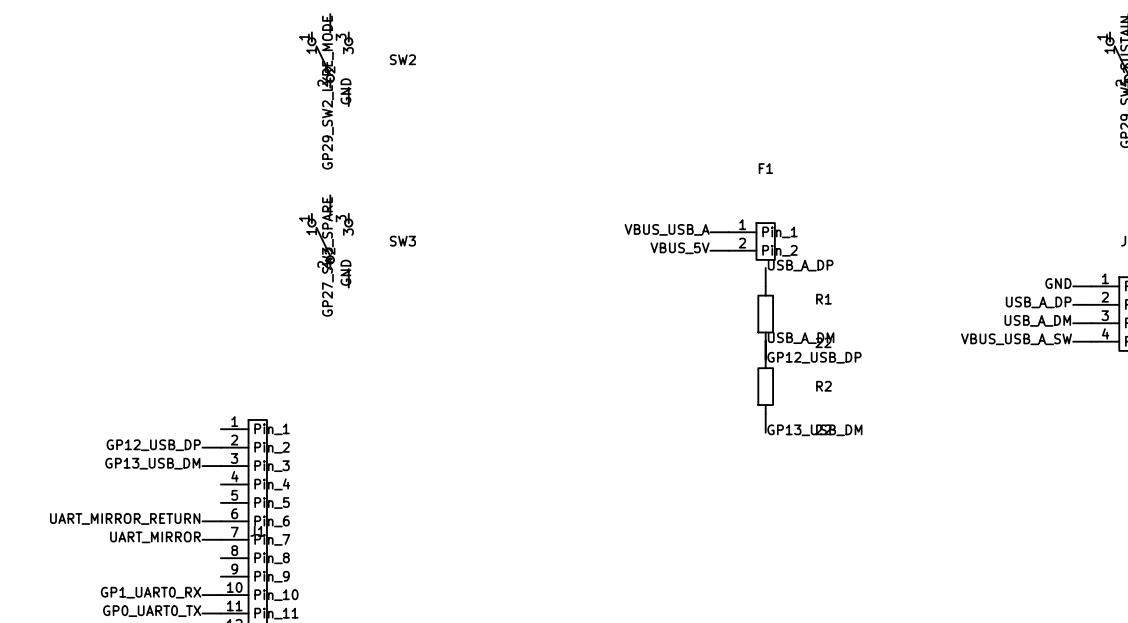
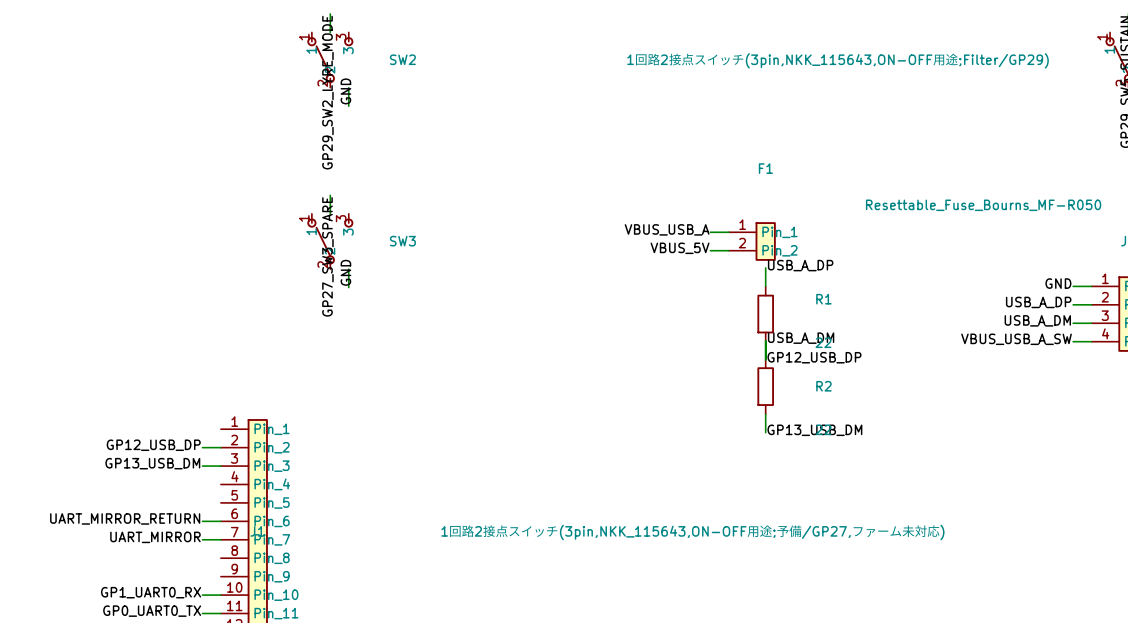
SW2 value: none -> 1回路2接点スイッチ(3pin,NKK_115643,ON-OFF用途;Filter/GP29) (838, 60)
F1 value: none -> Resettable_Fuse_Bourns_MF-R050 (983, 205)
SW3 value: none -> 1回路2接点スイッチ(3pin,NKK_115643,ON-OFF用途;予備/GP27,ファーム未対応) (692, 532)

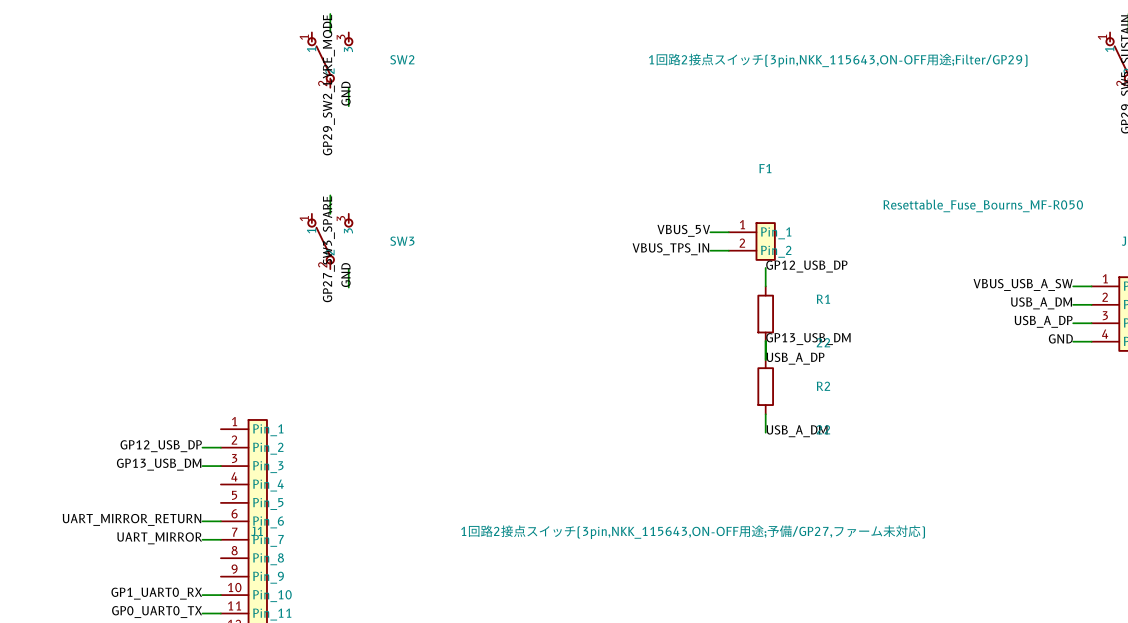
label: VBUS_USB_A (667, 229) -> VBUS_5V (683, 230)
label: VBUS_5V (680, 248) -> VBUS_TPS_IN (670, 249)
label: USB_A_DP (800, 265) -> GP12_USB_DP (806, 266)
label: GND (1058, 283) -> VBUS_USB_A_SW (1023, 284)
label: USB_A_DP (1038, 302) -> USB_A_DM (1041, 303)
label: USB_A_DM (1037, 320) -> USB_A_DP (1043, 321)
label: USB_A_DM (801, 338) -> GP13_USB_DM (808, 339)
label: VBUS_USB_A_SW (1016, 339) -> GND (1060, 338)
label: GP12_USB_DP (814, 357) -> USB_A_DP (795, 358)
label: GP13_USB_DM (814, 430) -> USB_A_DM (797, 431)

